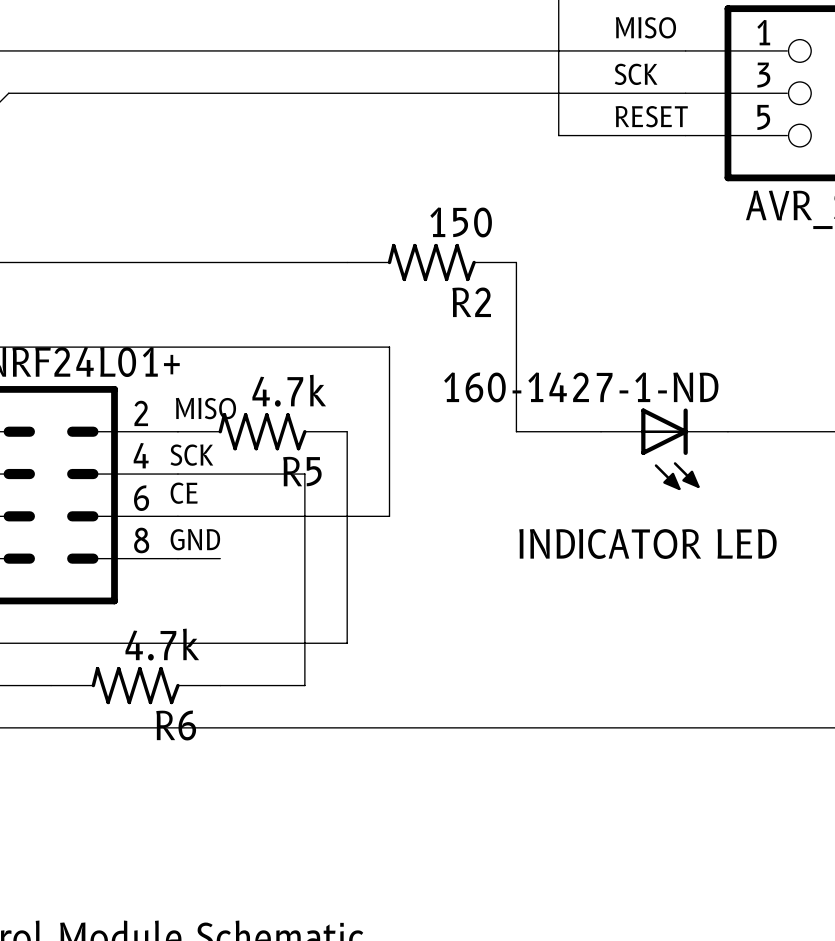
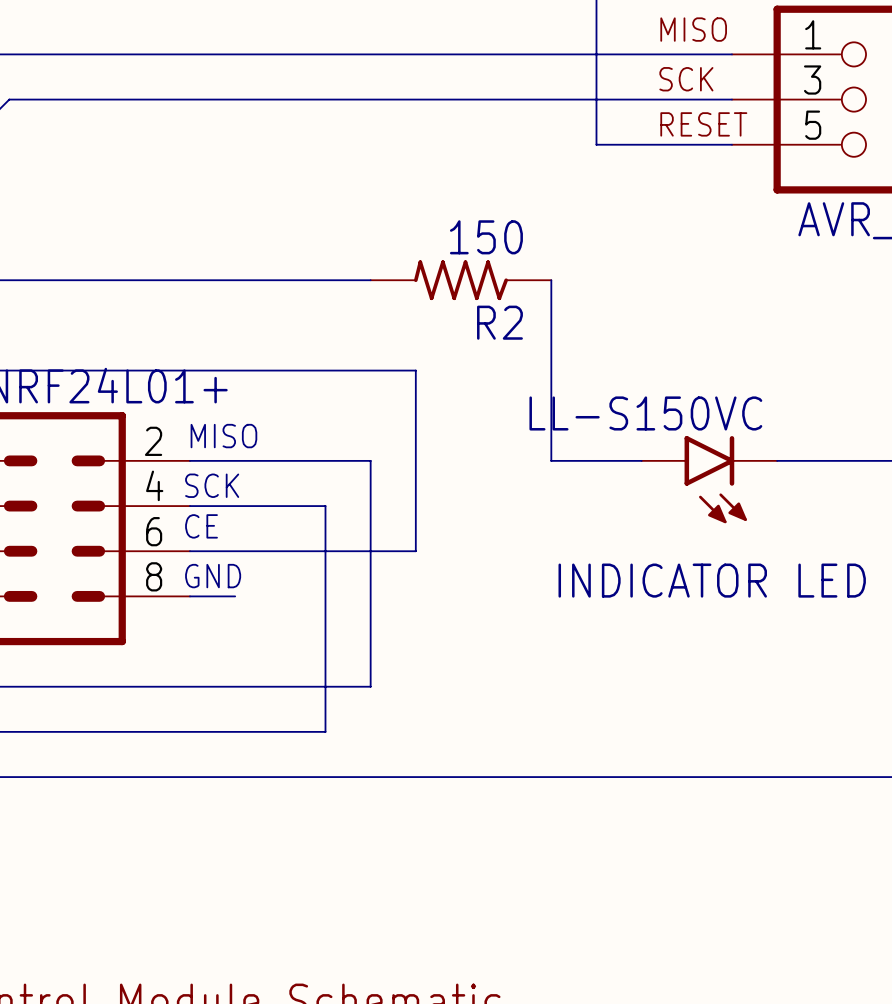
R5: 4.7k (262, 431) -> none
160-1427-1-ND: (664, 449) -> none
LL-S150VC: none -> (709, 479)
R6: 4.7k (135, 685) -> none

